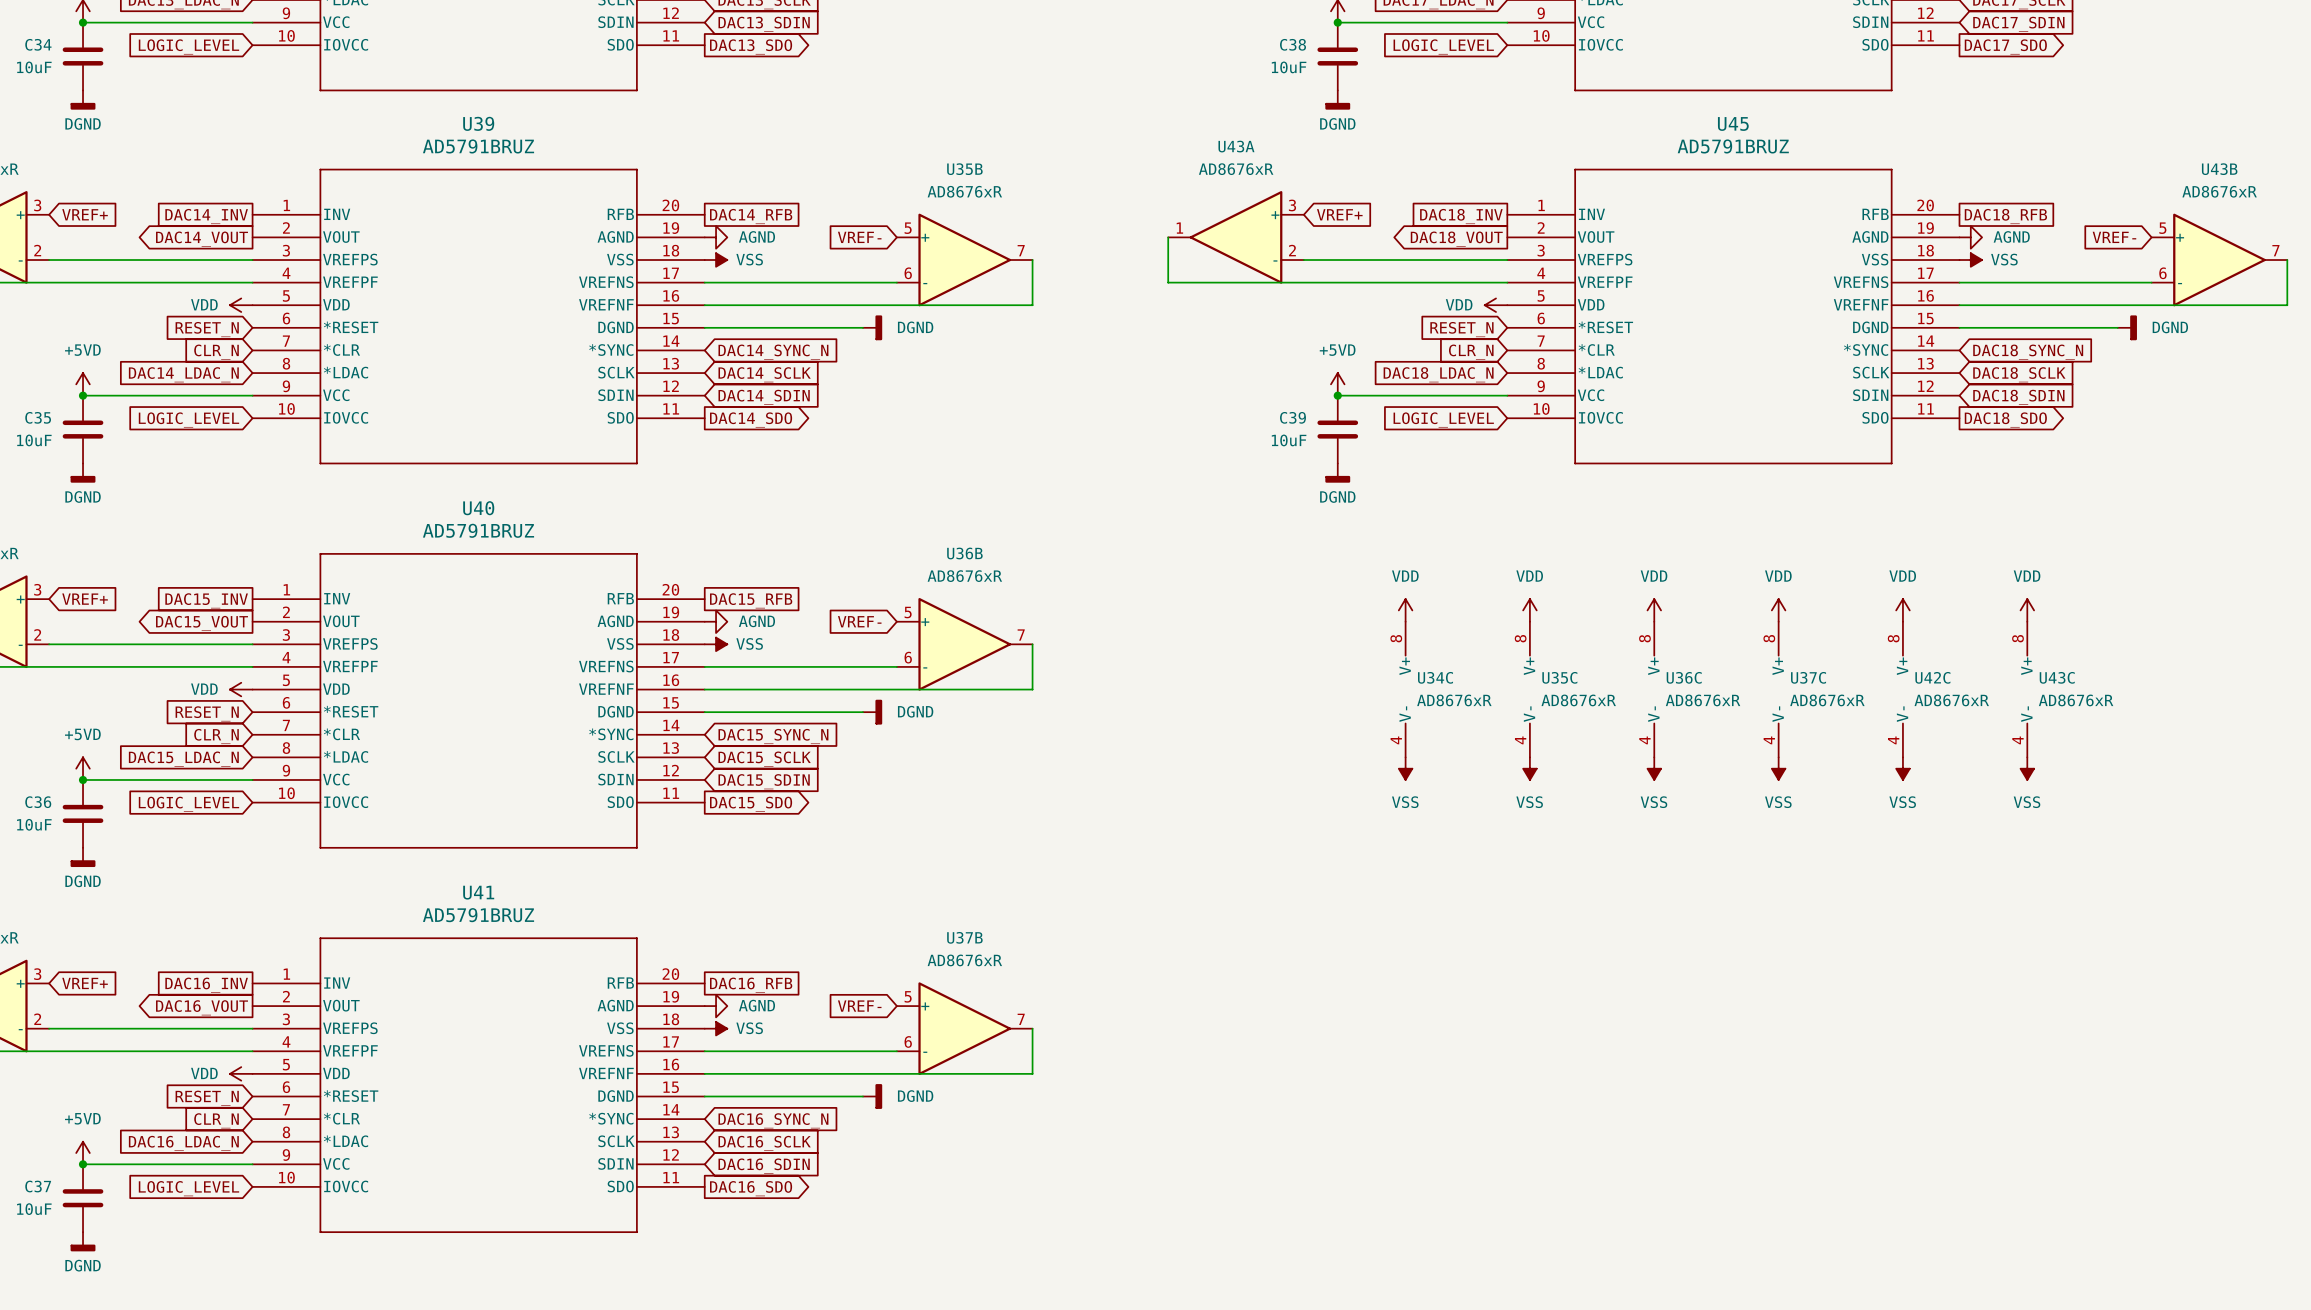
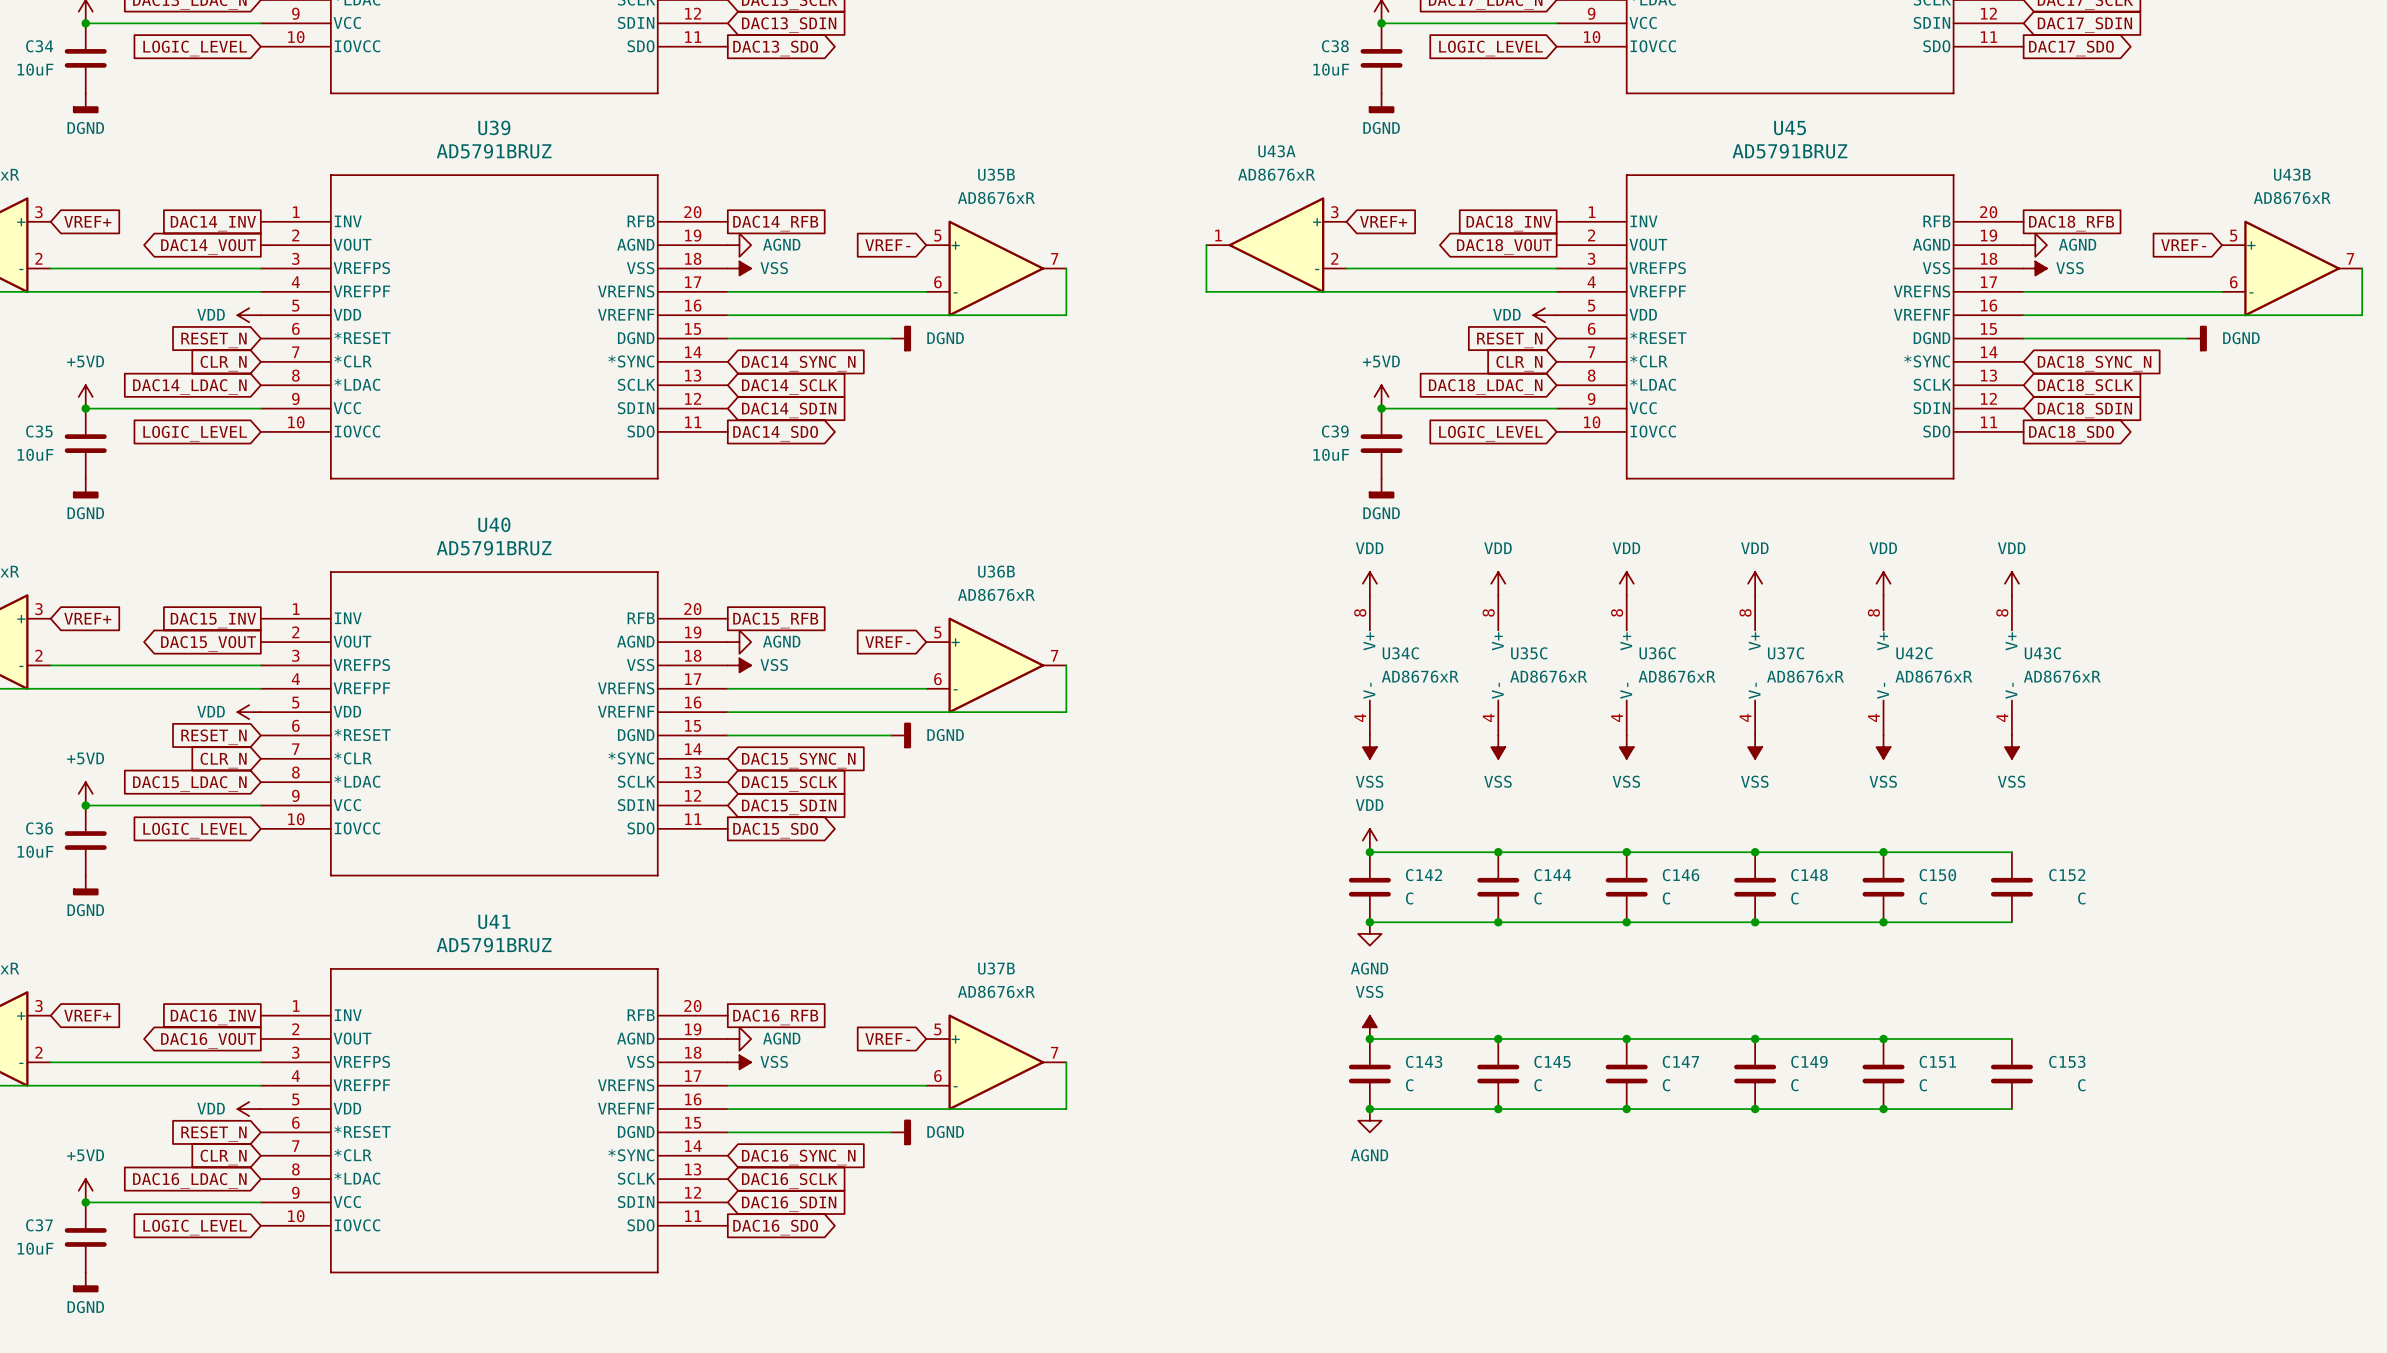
power symbol: none -> VDD (1369, 583)
power symbol: none -> VDD (1498, 583)
power symbol: none -> VDD (1626, 583)
power symbol: none -> VDD (1755, 583)
power symbol: none -> VDD (1883, 583)
power symbol: none -> VDD (2011, 583)
power symbol: VDD (1405, 610) -> none
power symbol: VDD (1529, 610) -> none
power symbol: VDD (1654, 610) -> none
power symbol: VDD (1778, 610) -> none
power symbol: VDD (1902, 610) -> none
power symbol: VDD (2027, 610) -> none
U34C position: (1405, 689) -> (1369, 665)
U35C position: (1529, 689) -> (1498, 665)
U36C position: (1654, 689) -> (1626, 665)
U37C position: (1778, 689) -> (1755, 665)
U42C position: (1902, 689) -> (1883, 665)
U43C position: (2027, 689) -> (2011, 665)
power symbol: none -> VSS (1369, 747)
power symbol: none -> VSS (1498, 747)
power symbol: none -> VSS (1626, 747)
power symbol: none -> VSS (1755, 747)
power symbol: none -> VSS (1883, 747)
power symbol: none -> VSS (2011, 747)
power symbol: VSS (1405, 768) -> none
power symbol: VSS (1529, 768) -> none
power symbol: VSS (1654, 768) -> none
power symbol: VSS (1778, 768) -> none
power symbol: VSS (1902, 768) -> none
power symbol: VSS (2027, 768) -> none
power symbol: none -> VDD (1369, 840)
wire: none -> (1369, 852) (2011, 852)
junction: none -> (1369, 852)
junction: none -> (1498, 852)
junction: none -> (1626, 852)
junction: none -> (1755, 852)
junction: none -> (1883, 852)
C142: none -> C (1369, 887)
C144: none -> C (1498, 887)
C146: none -> C (1626, 887)
C148: none -> C (1755, 887)
C150: none -> C (1883, 887)
C152: none -> C (2011, 887)
wire: none -> (1369, 922) (2011, 922)
junction: none -> (1369, 922)
junction: none -> (1498, 922)
junction: none -> (1626, 922)
junction: none -> (1755, 922)
junction: none -> (1883, 922)
power symbol: none -> AGND (1369, 933)
power symbol: none -> VSS (1369, 1027)
wire: none -> (1369, 1038) (2011, 1038)
junction: none -> (1369, 1038)
junction: none -> (1498, 1038)
junction: none -> (1626, 1038)
junction: none -> (1755, 1038)
junction: none -> (1883, 1038)
C143: none -> C (1369, 1074)
C145: none -> C (1498, 1074)
C147: none -> C (1626, 1074)
C149: none -> C (1755, 1074)
C151: none -> C (1883, 1074)
C153: none -> C (2011, 1074)
wire: none -> (1369, 1109) (2011, 1109)
junction: none -> (1369, 1109)
junction: none -> (1498, 1109)
junction: none -> (1626, 1109)
junction: none -> (1755, 1109)
junction: none -> (1883, 1109)
power symbol: none -> AGND (1369, 1120)

